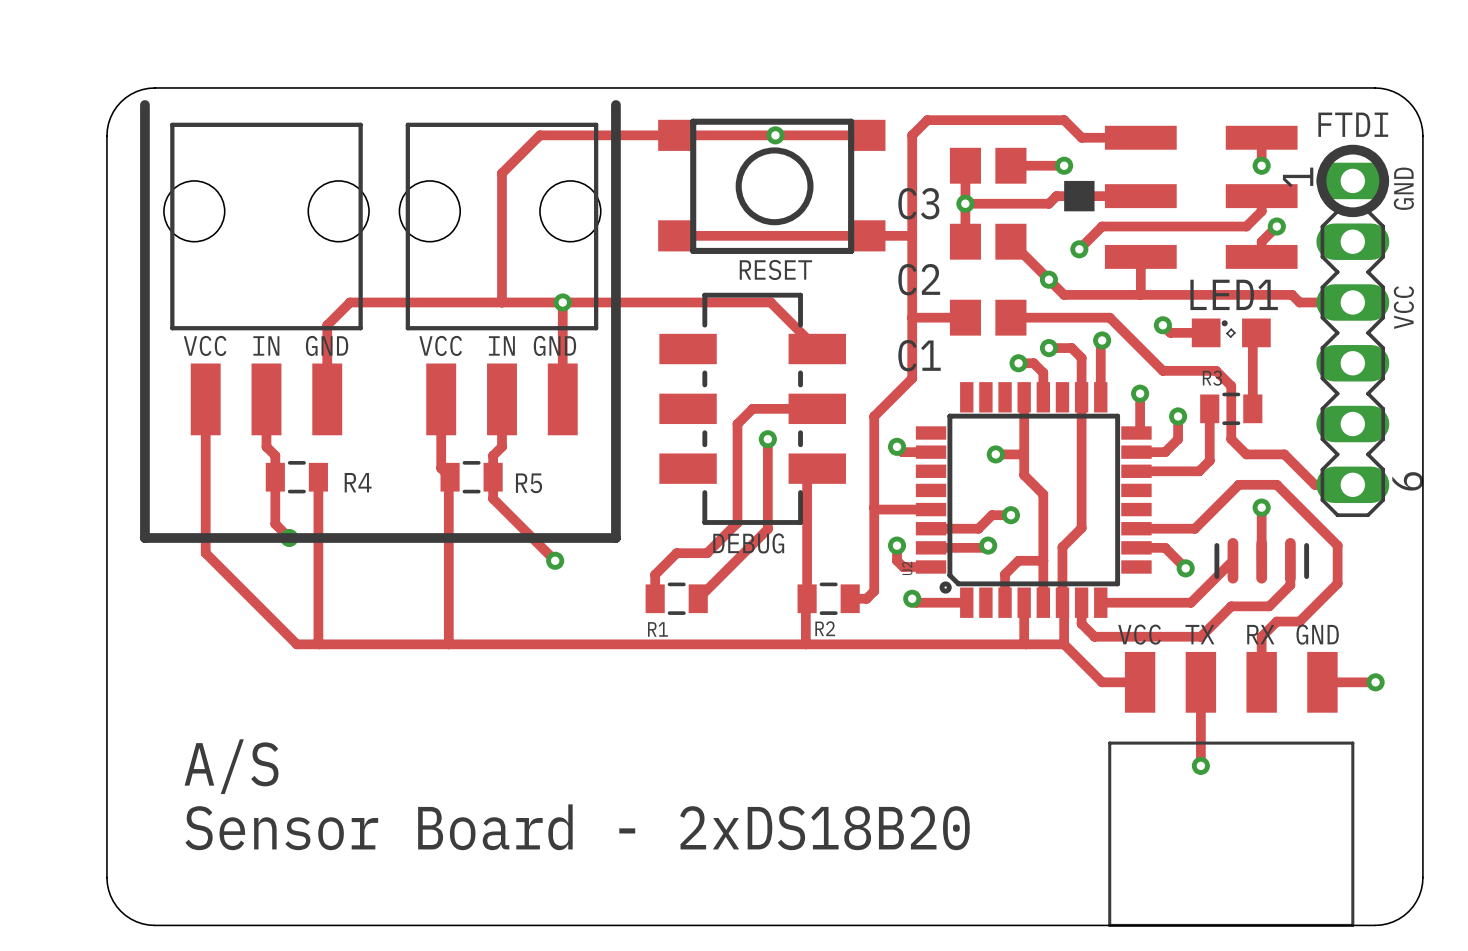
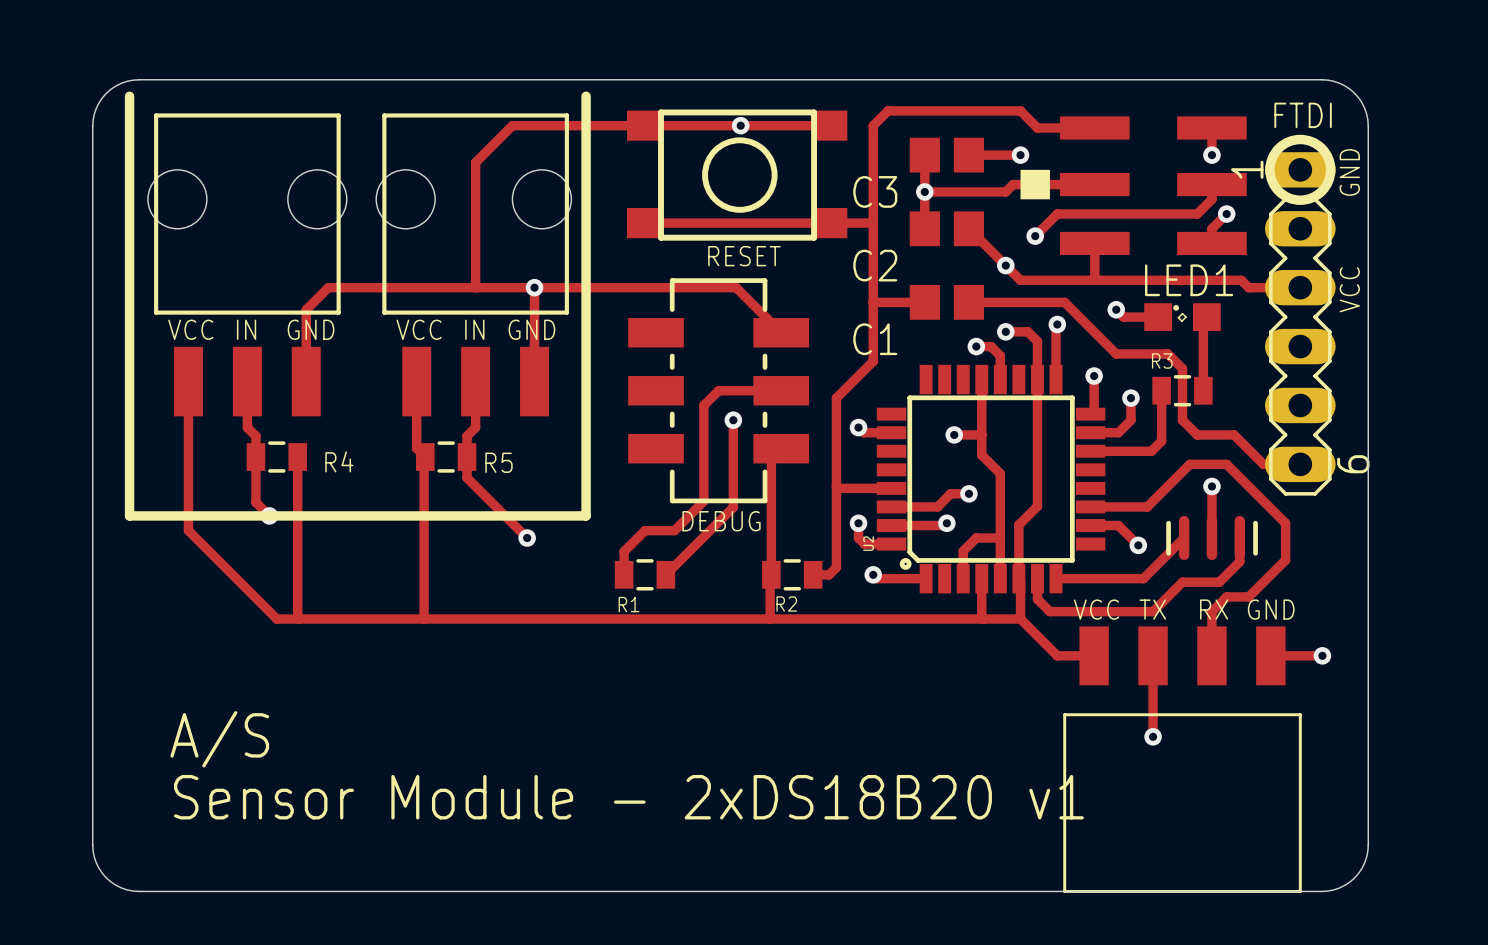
text: Sensor Board - 2xDS18B20 (577, 827) -> Sensor Module - 2xDS18B20 v1 (628, 797)

